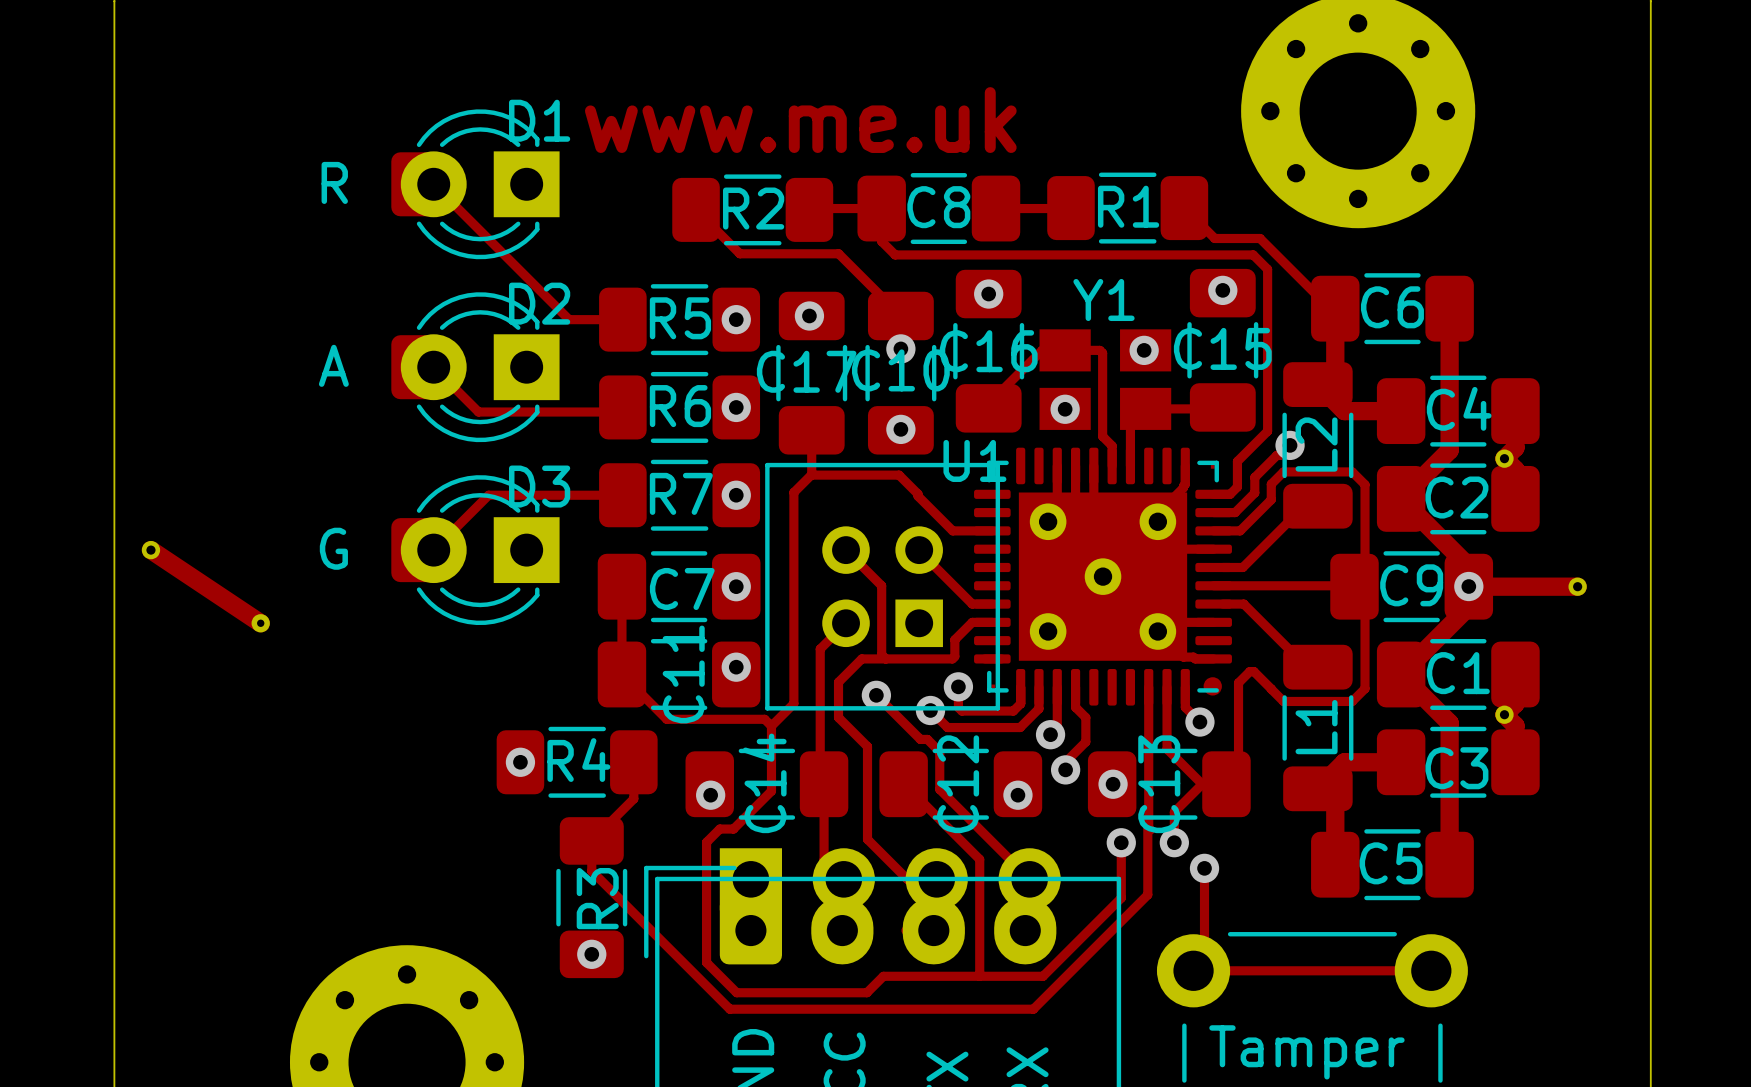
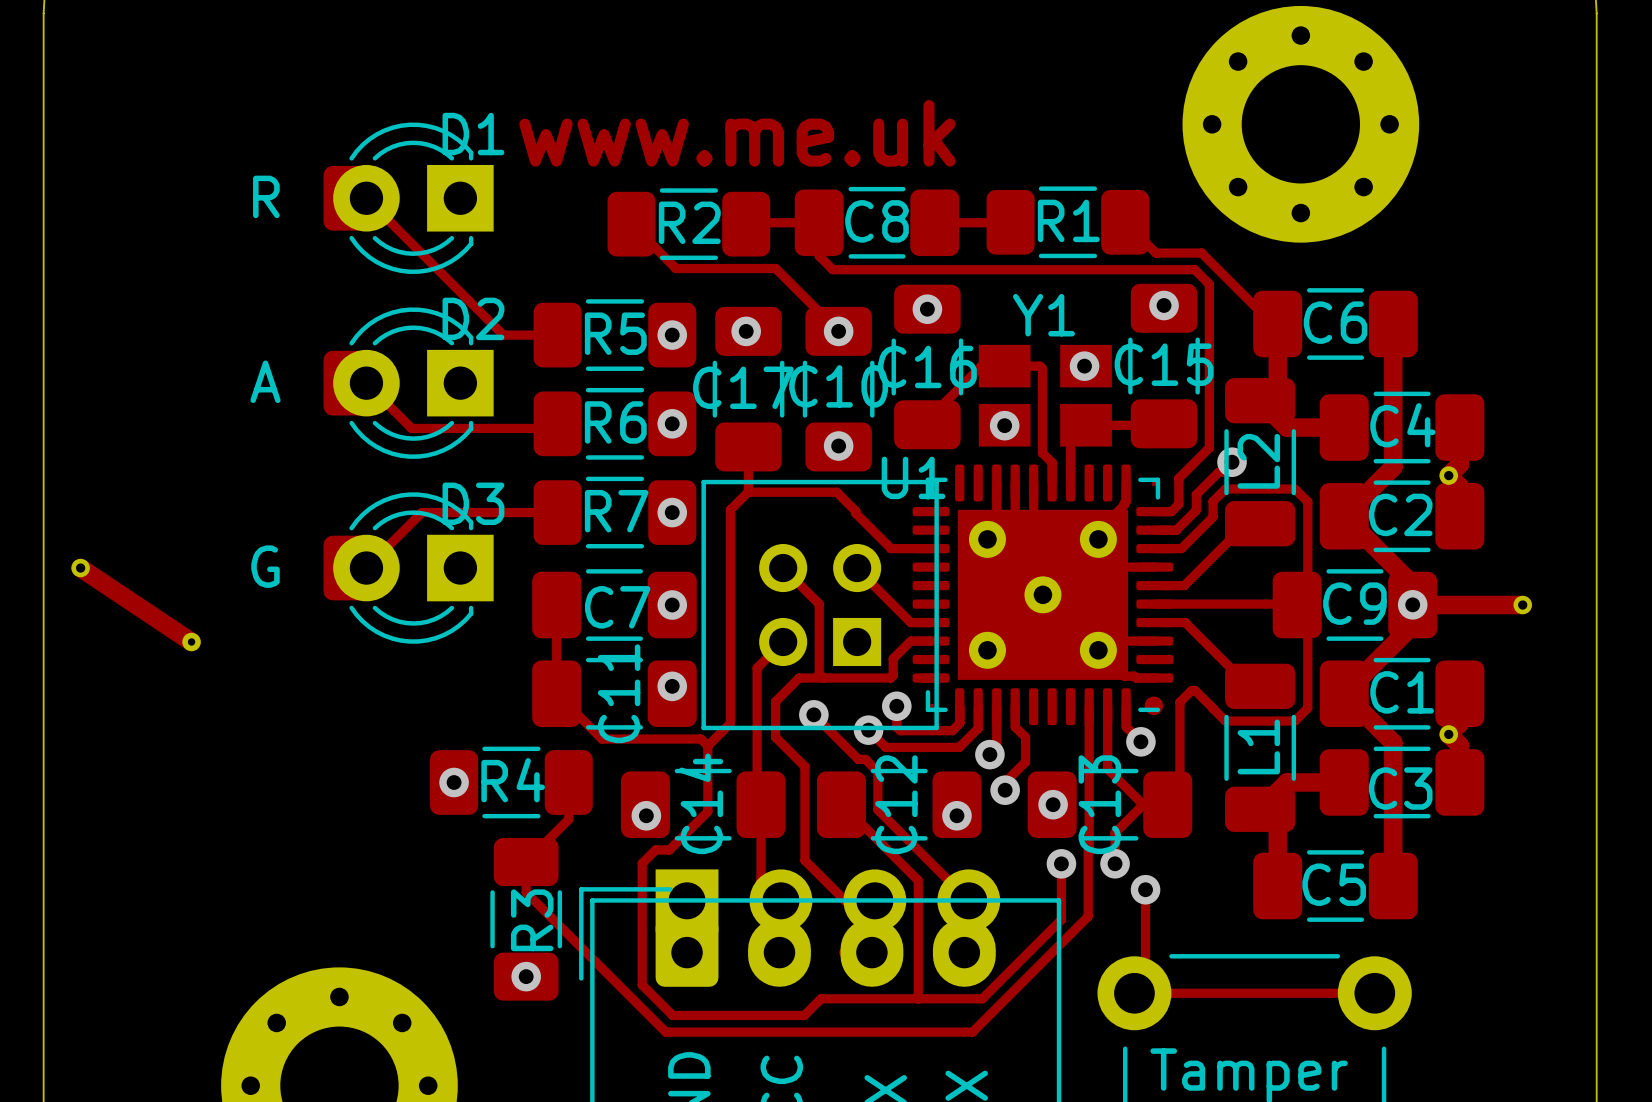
via position: (900, 348) -> (838, 331)

